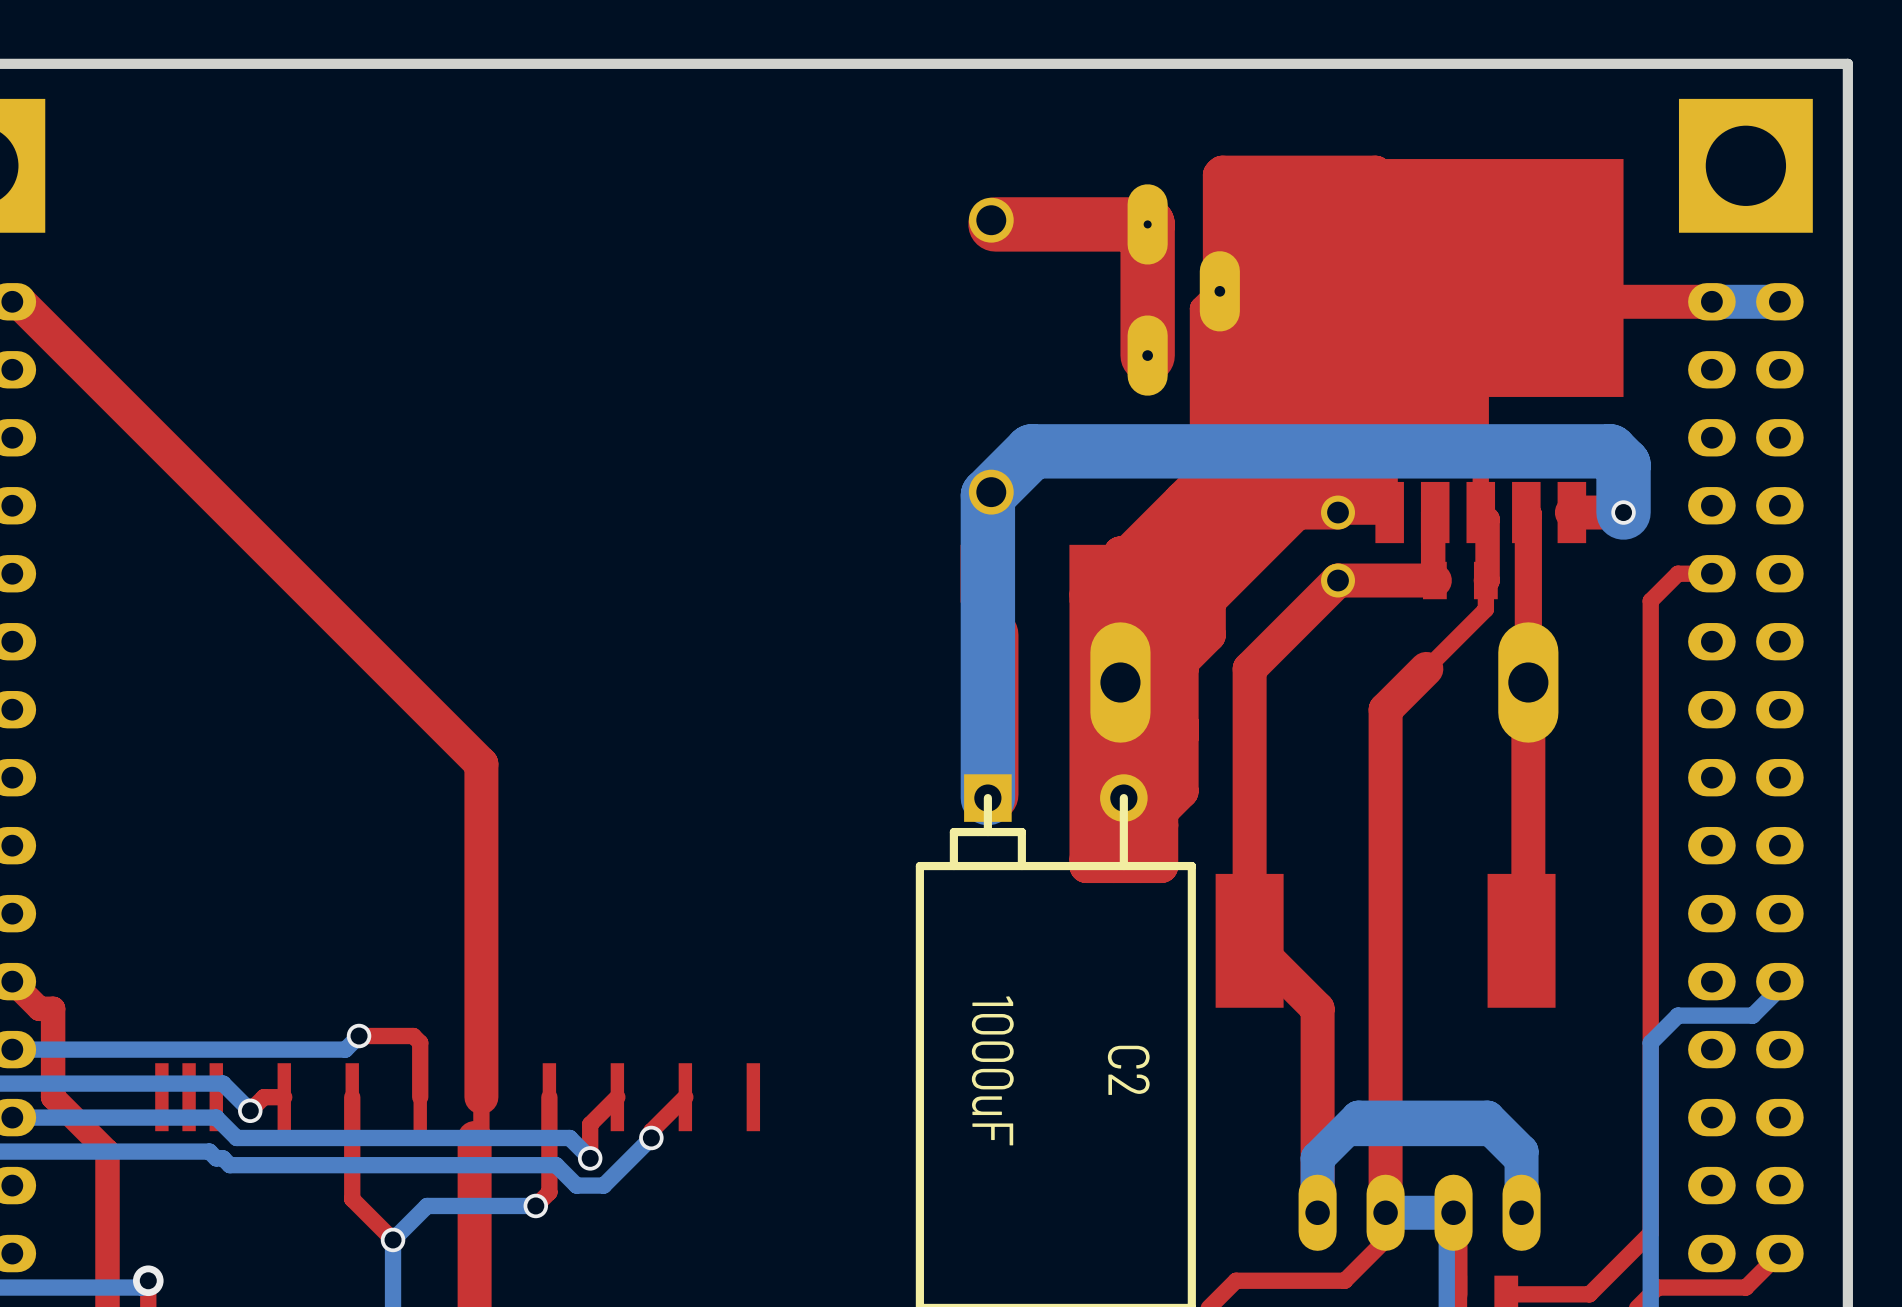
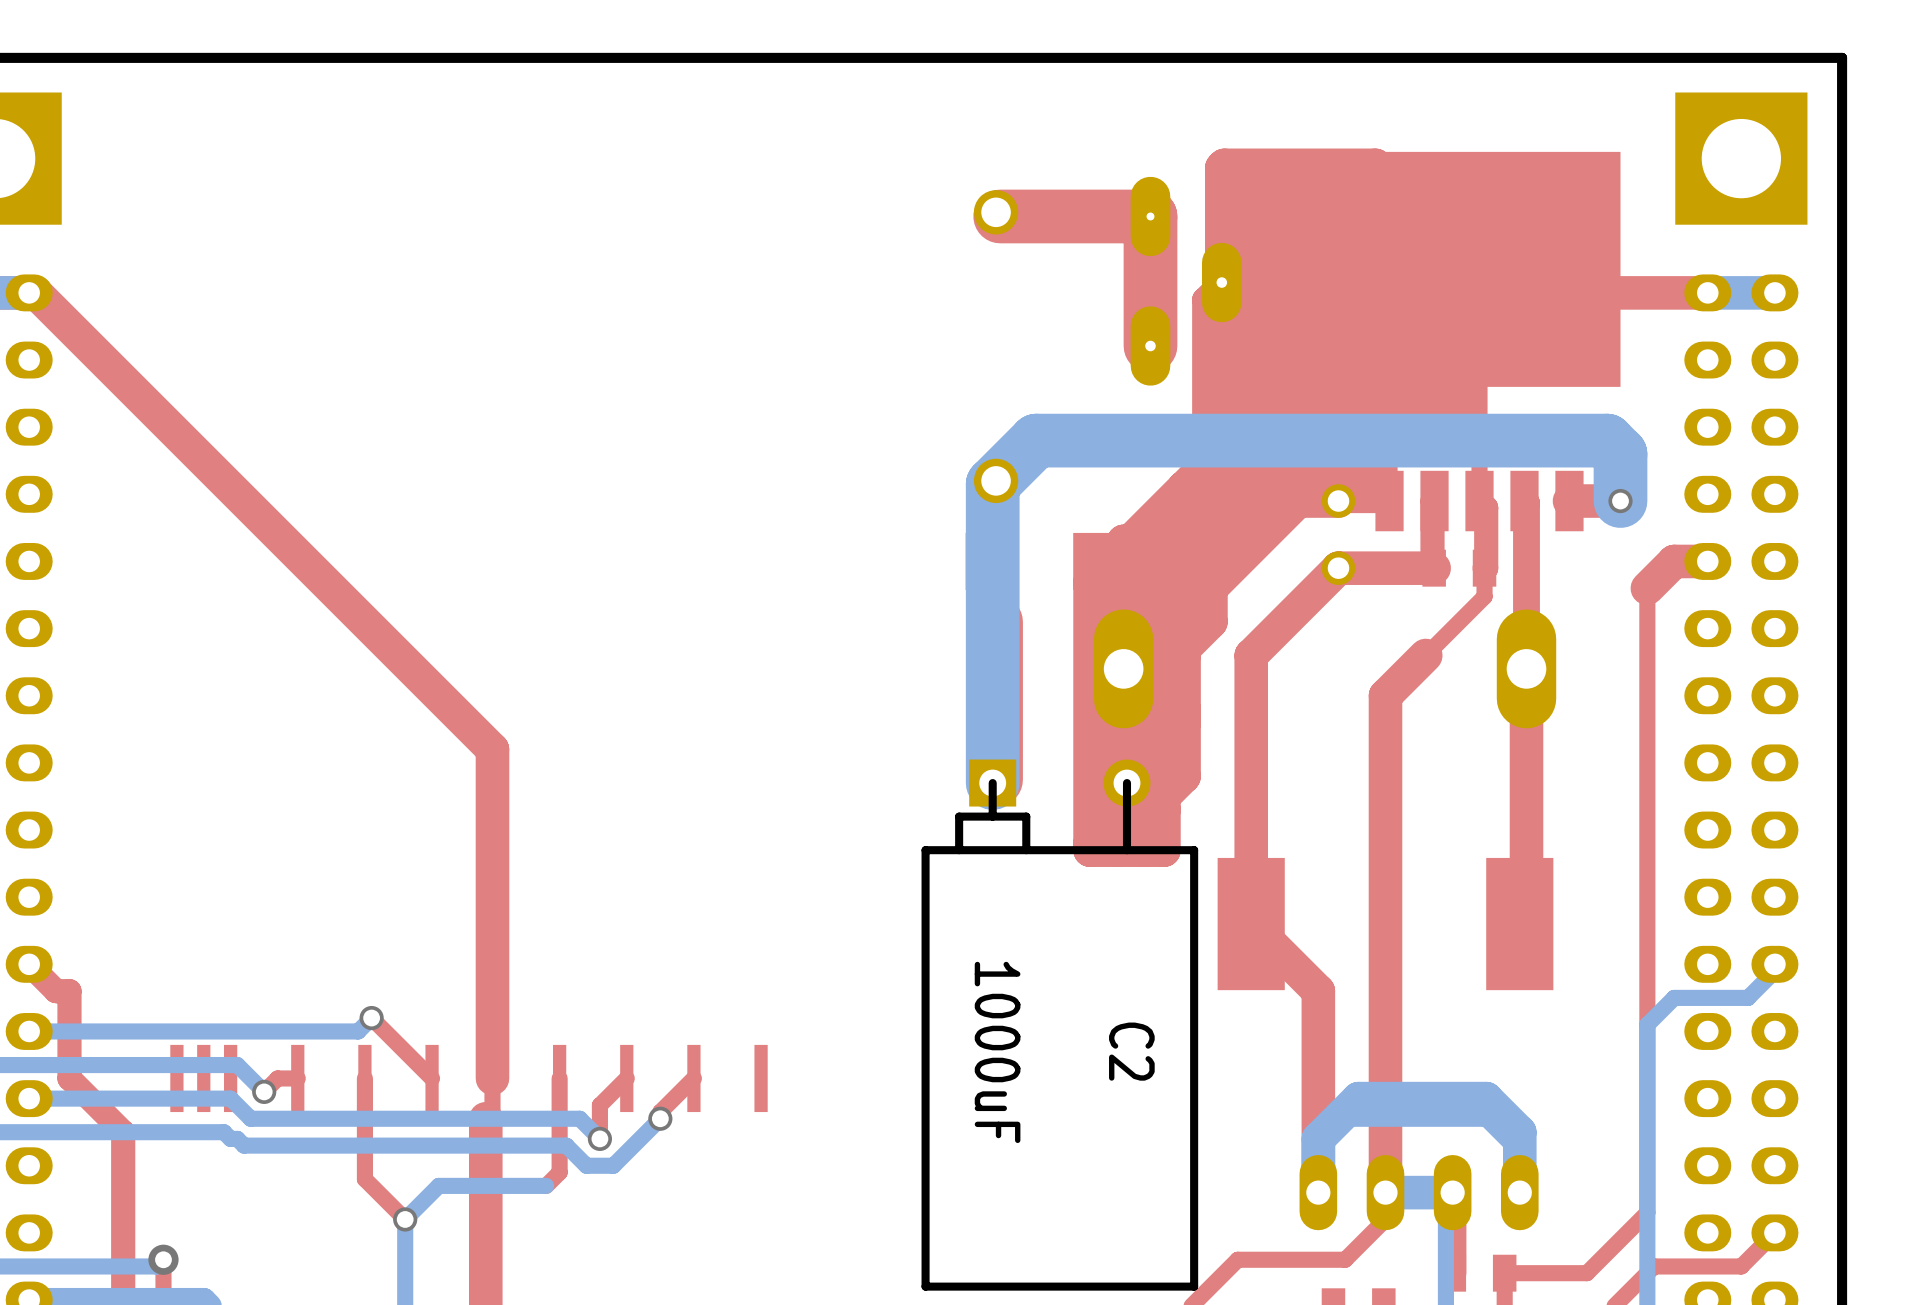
top track width: thin (1711, 573) (1677, 573) (1650, 600) -> thick (1707, 561) (1674, 561) (1647, 588)
top track: (359, 1036) (413, 1036) (420, 1042) (420, 1097) -> (371, 1018) (432, 1078)
via: (535, 1205) -> none

